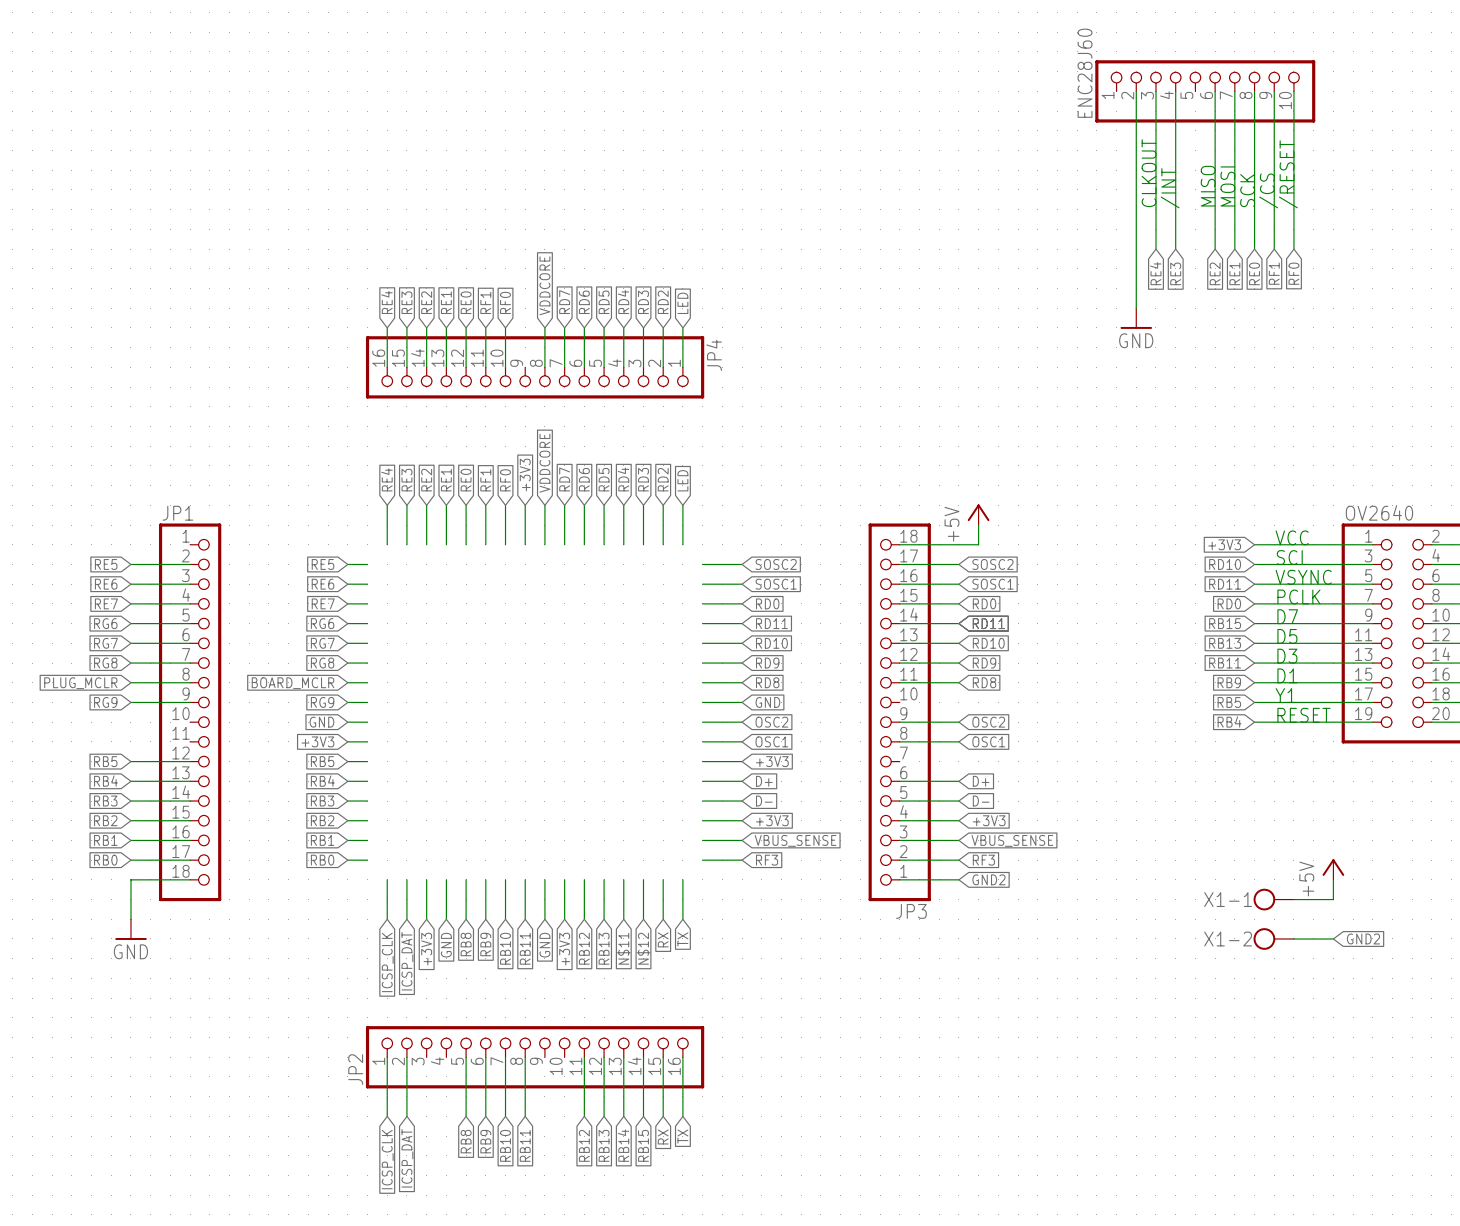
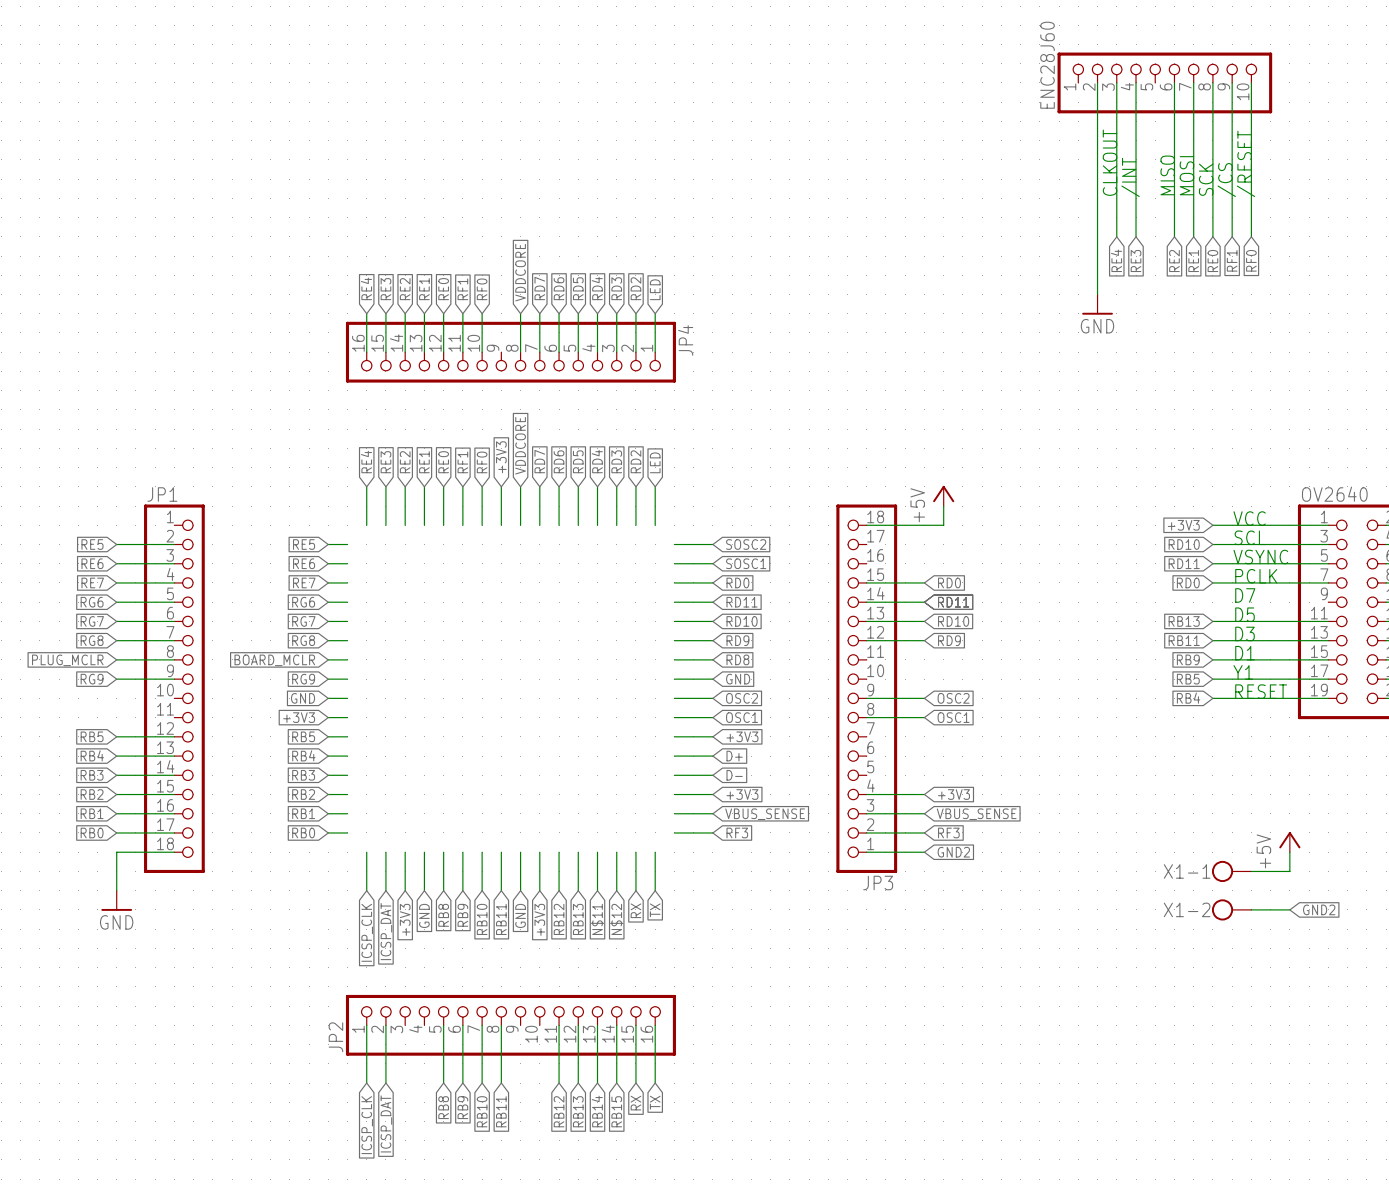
wire: (899, 564) (958, 564) -> none
global label: SOSC2 (992, 564) -> none
wire: (899, 584) (958, 584) -> none
global label: SOSC1 (992, 584) -> none
global label: RB15 (1225, 623) -> none
wire: (1254, 623) (1372, 623) -> none
wire: (899, 682) (958, 682) -> none
global label: RD8 (984, 682) -> none
wire: (899, 781) (958, 781) -> none
global label: D+ (981, 781) -> none
wire: (899, 801) (958, 801) -> none
global label: D- (981, 801) -> none

